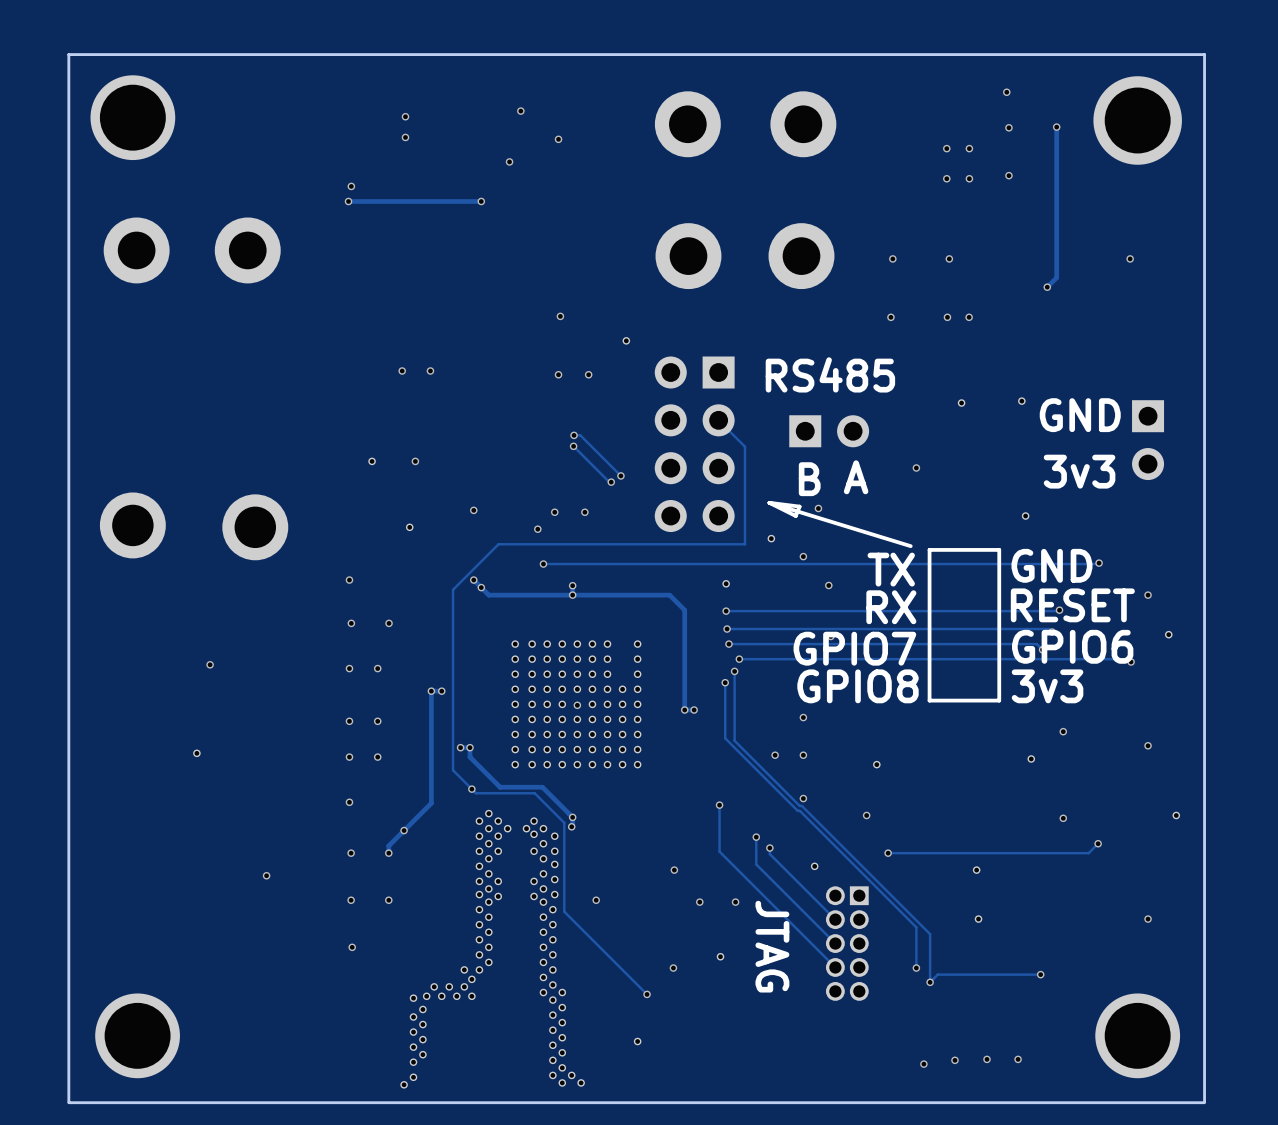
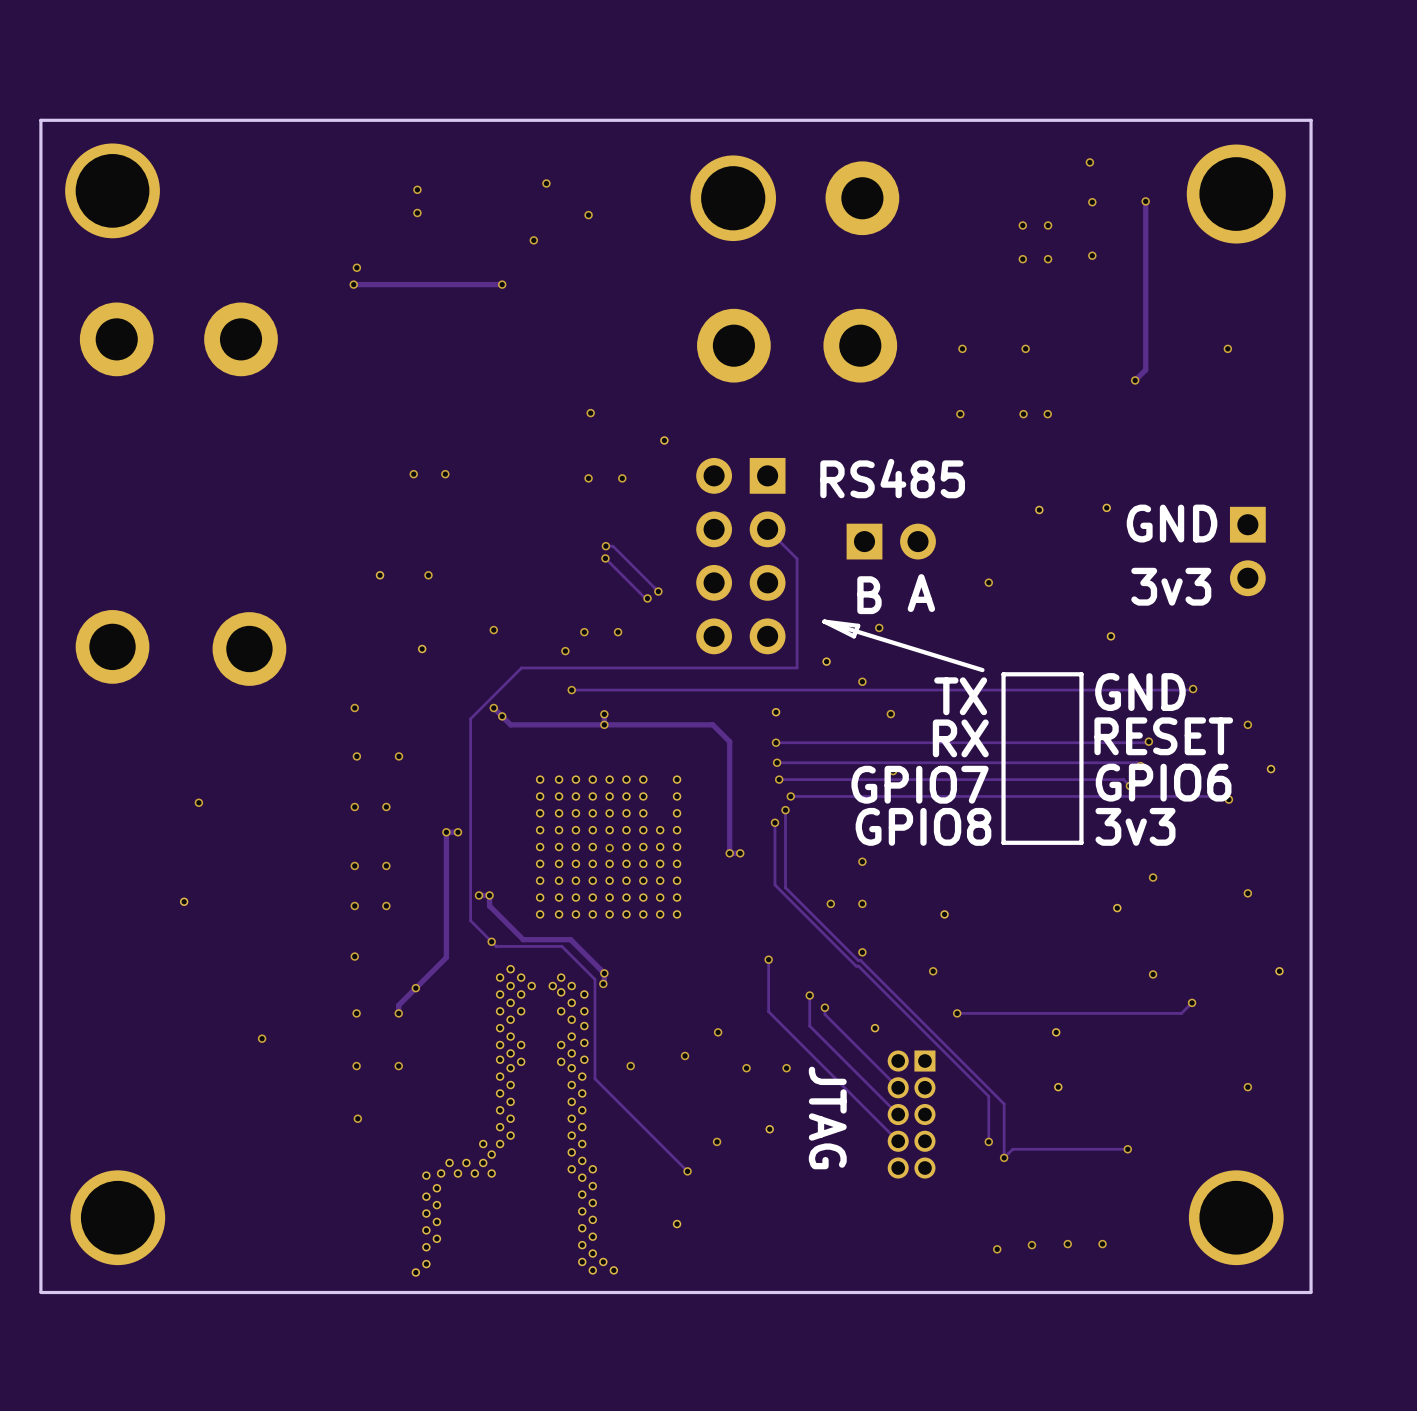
part footprint: [654, 91, 721, 158] -> [690, 155, 777, 242]
via: none -> (685, 1055)

